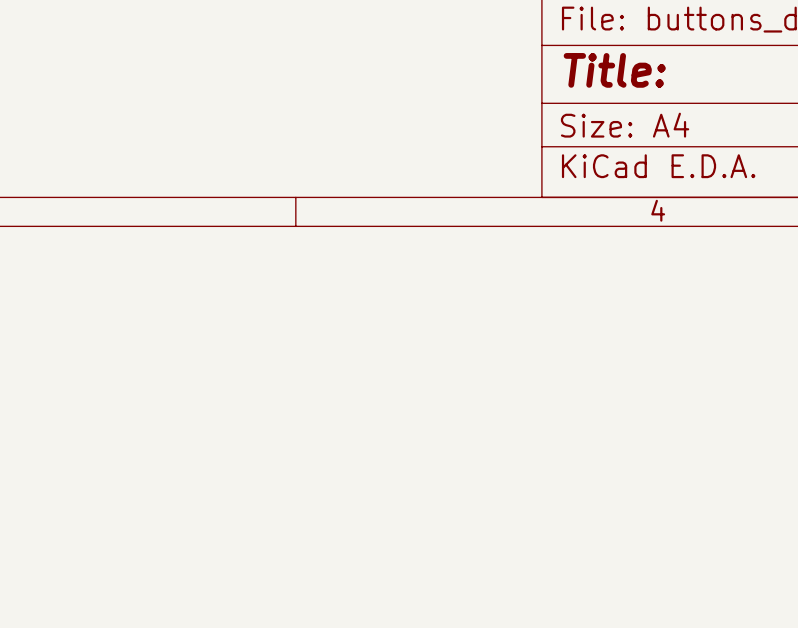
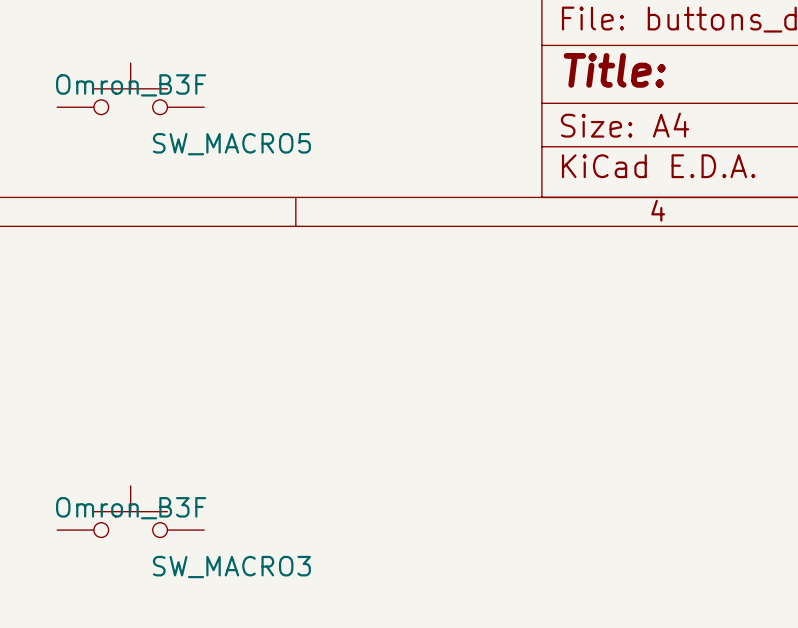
SW_MACRO5: none -> Omron_B3F (130, 88)
SW_MACRO3: none -> Omron_B3F (130, 511)

